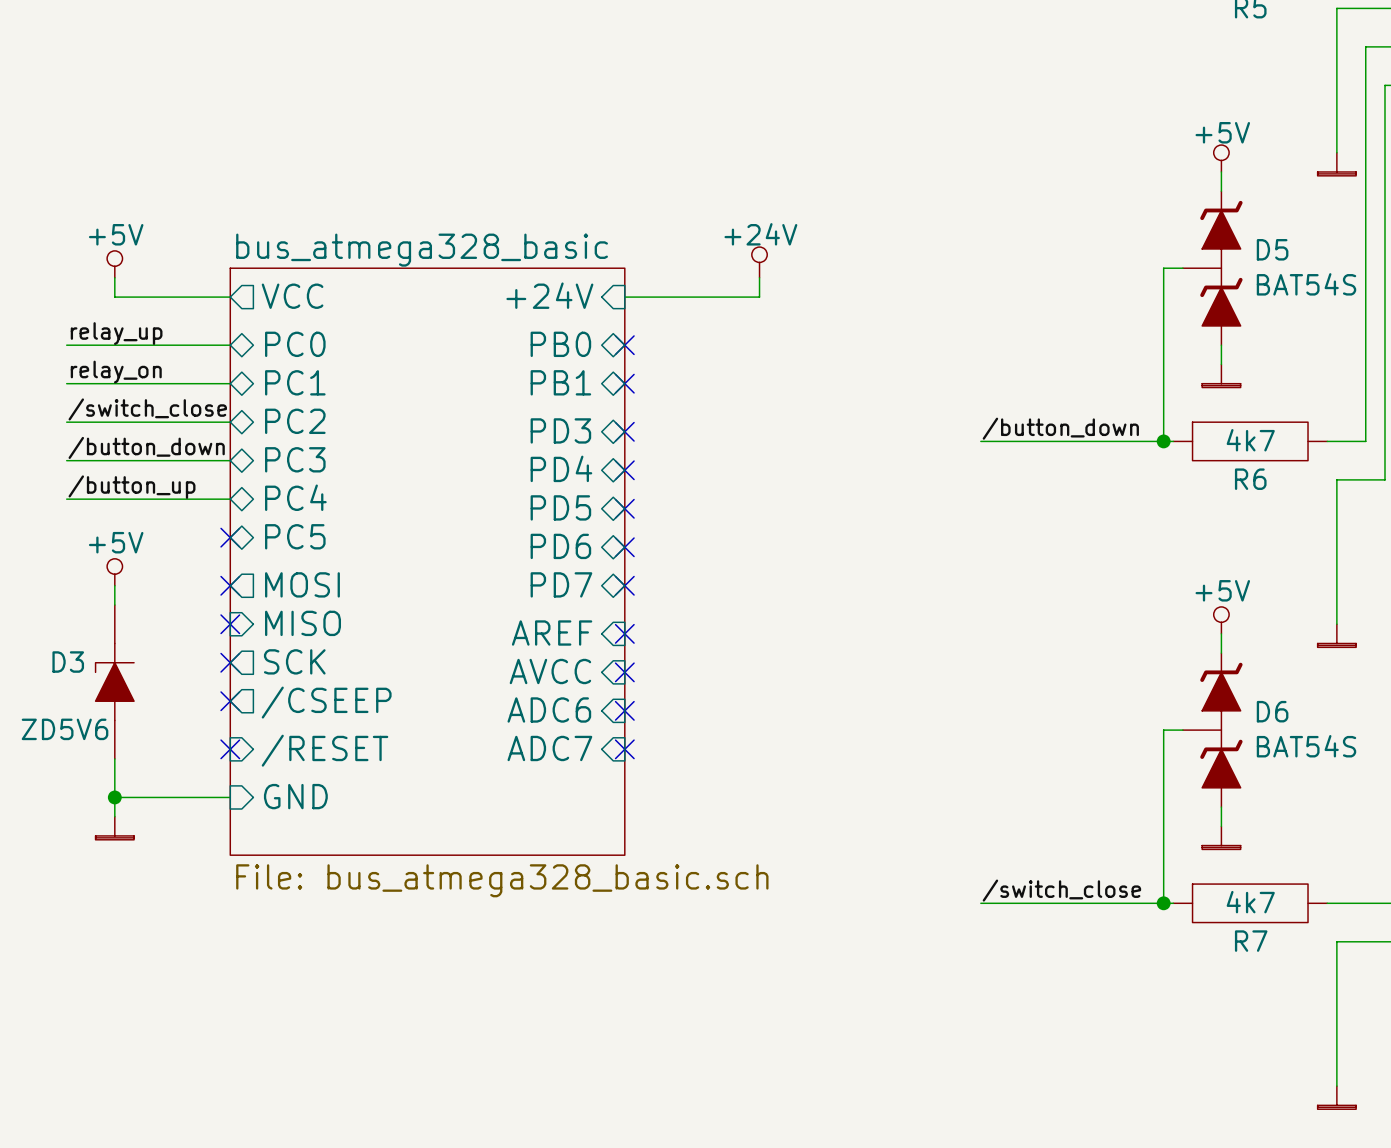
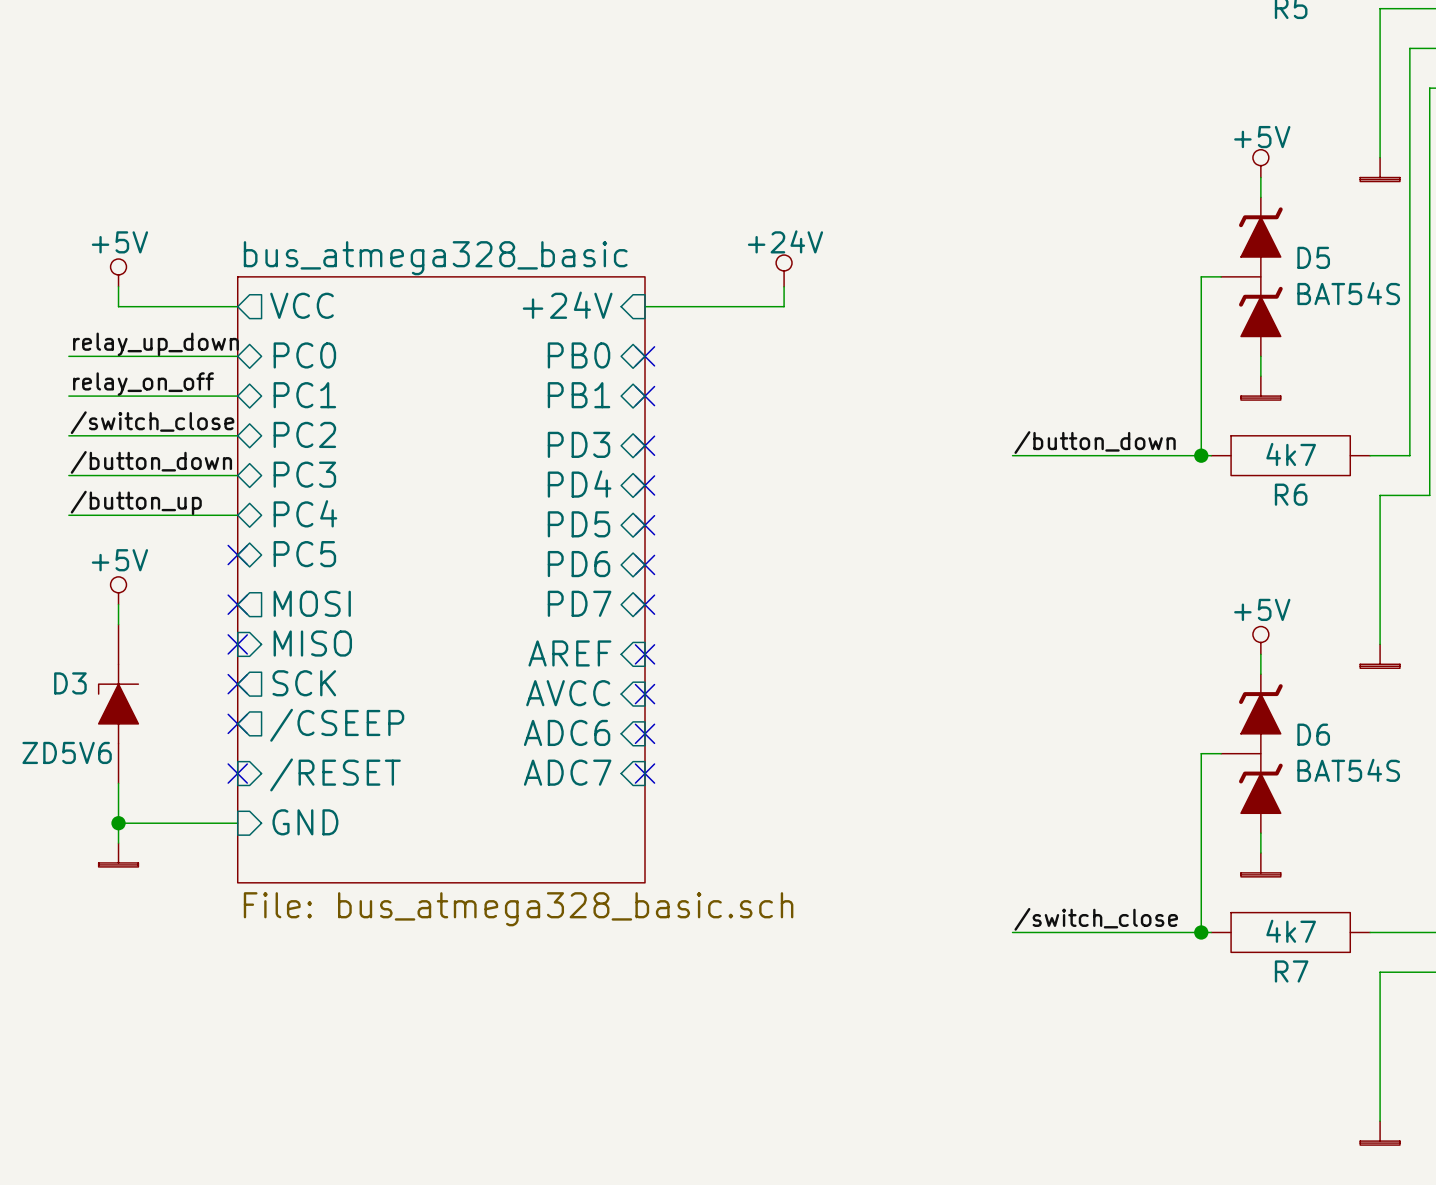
label: relay_up (116, 333) -> relay_up_down (155, 344)
label: relay_on (116, 372) -> relay_on_off (143, 384)

